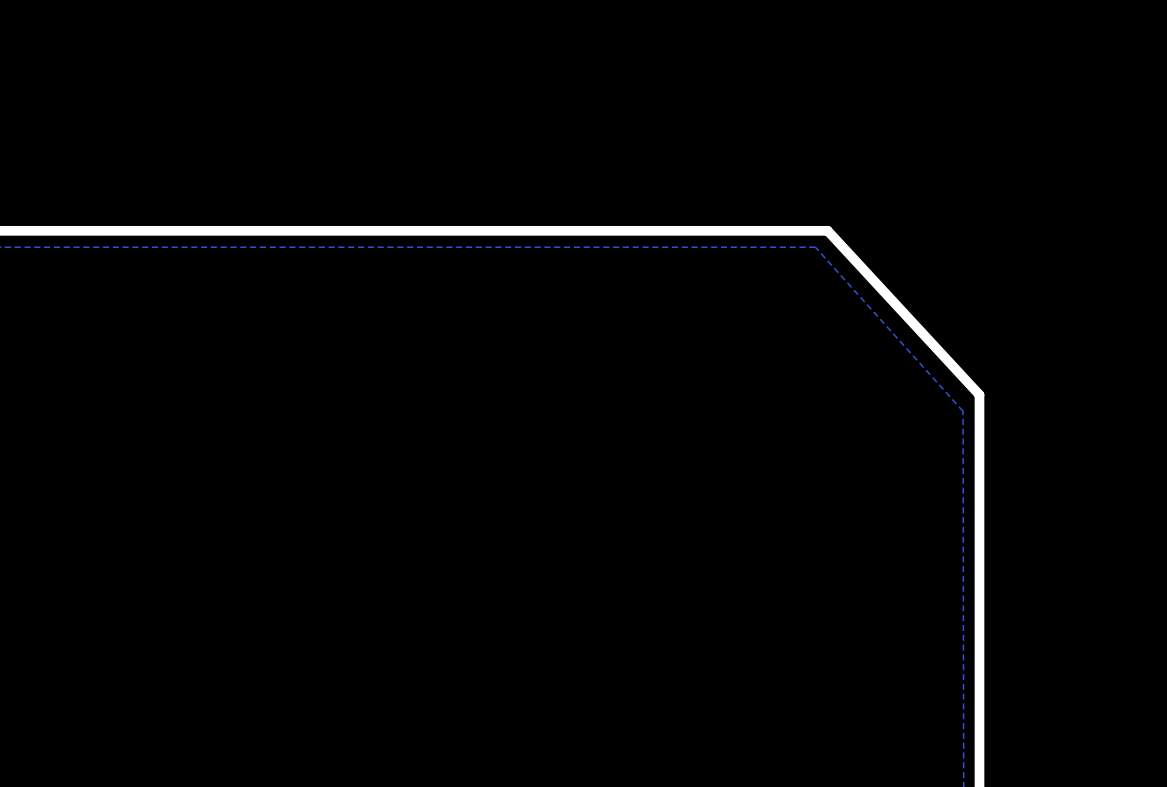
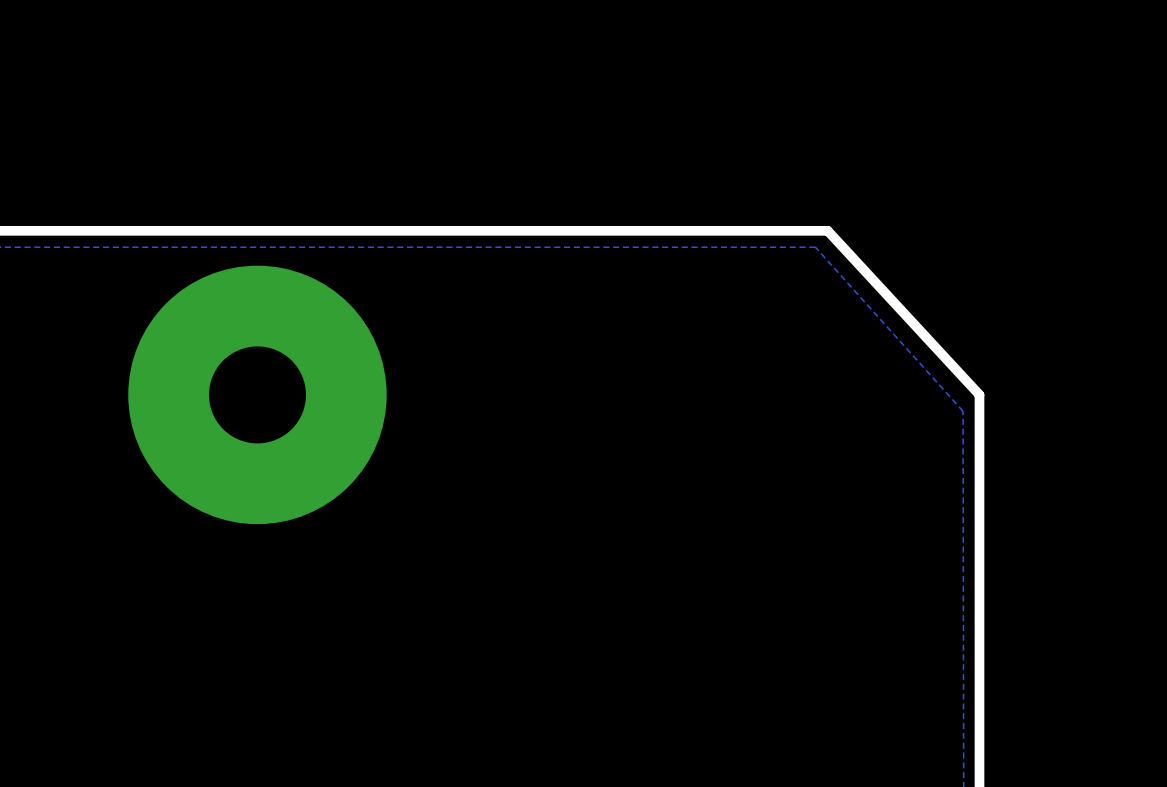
part: none -> (257, 394)

